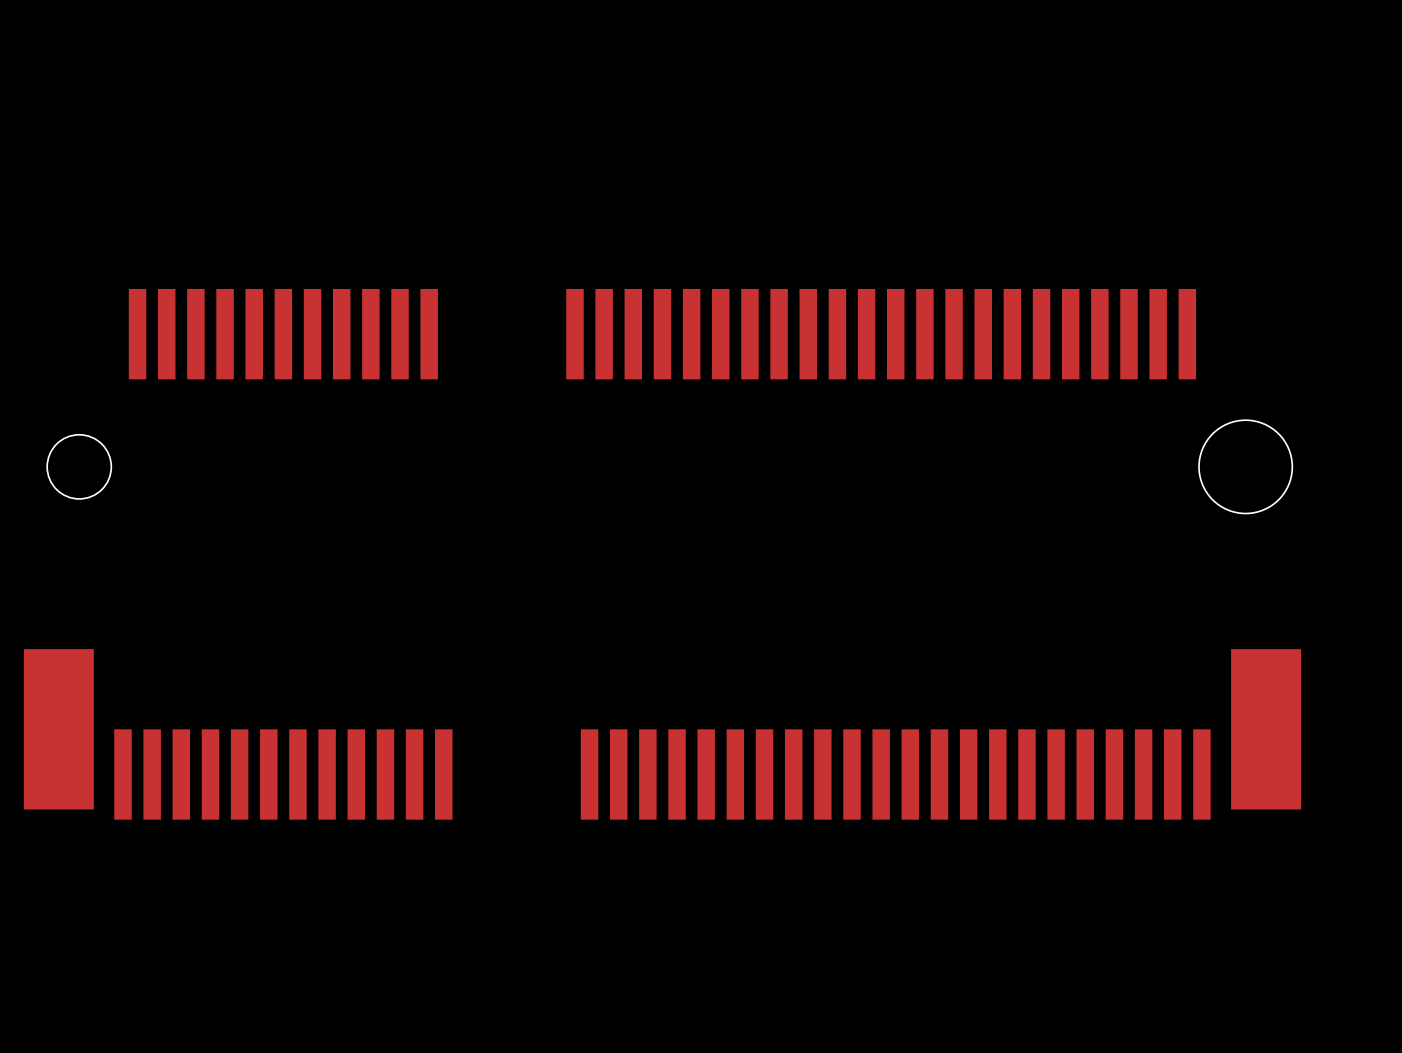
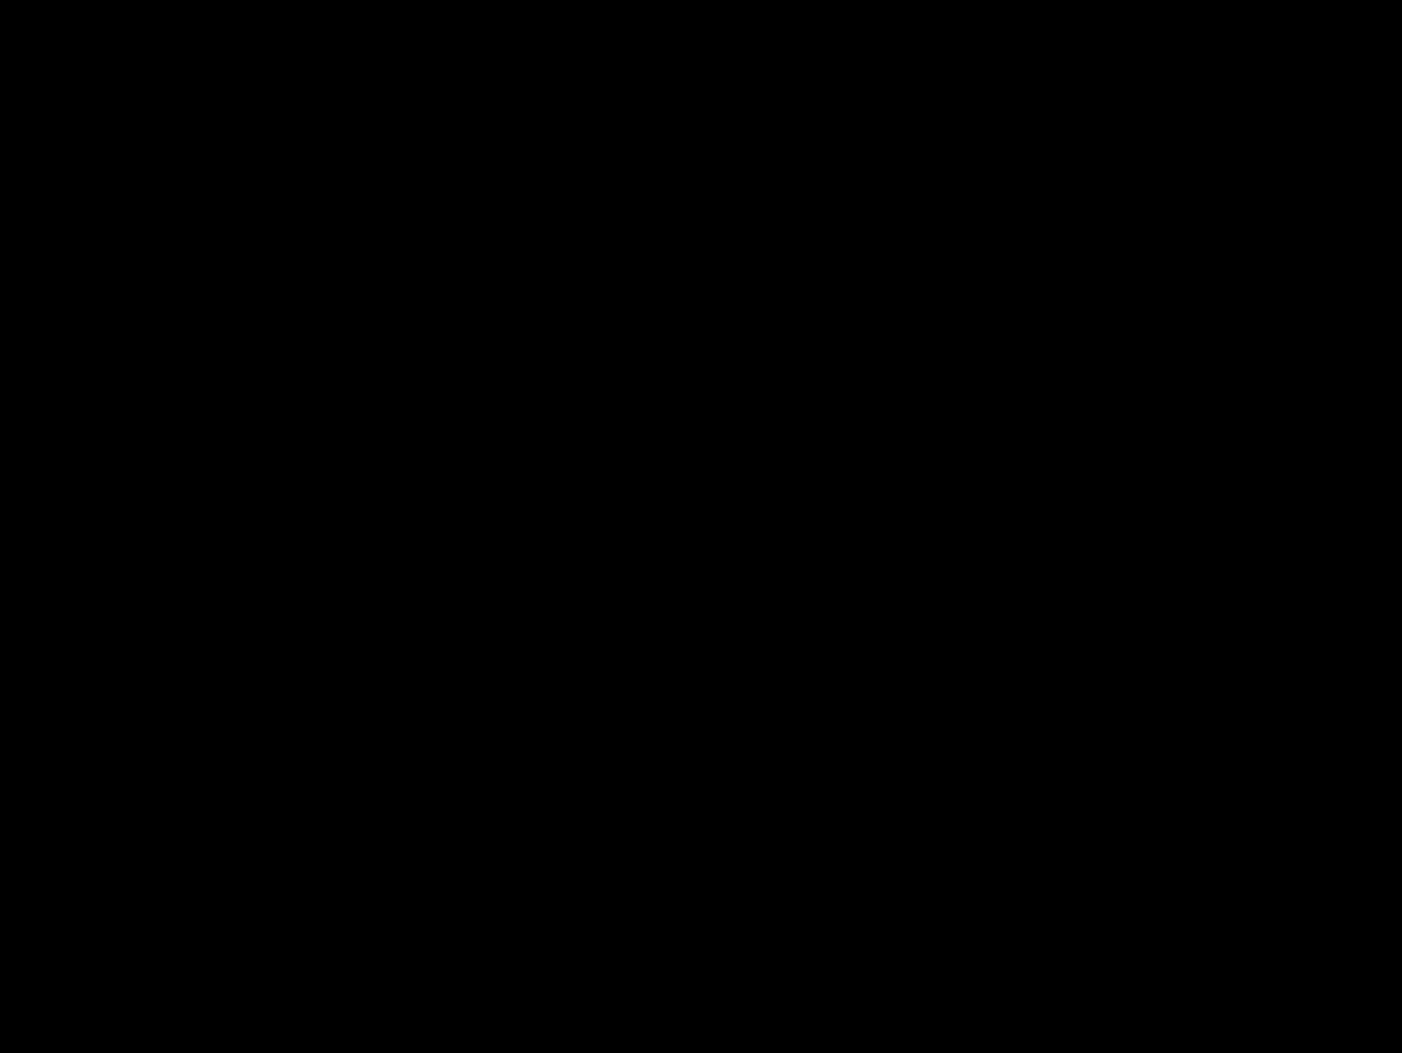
part: (662, 554) -> none

